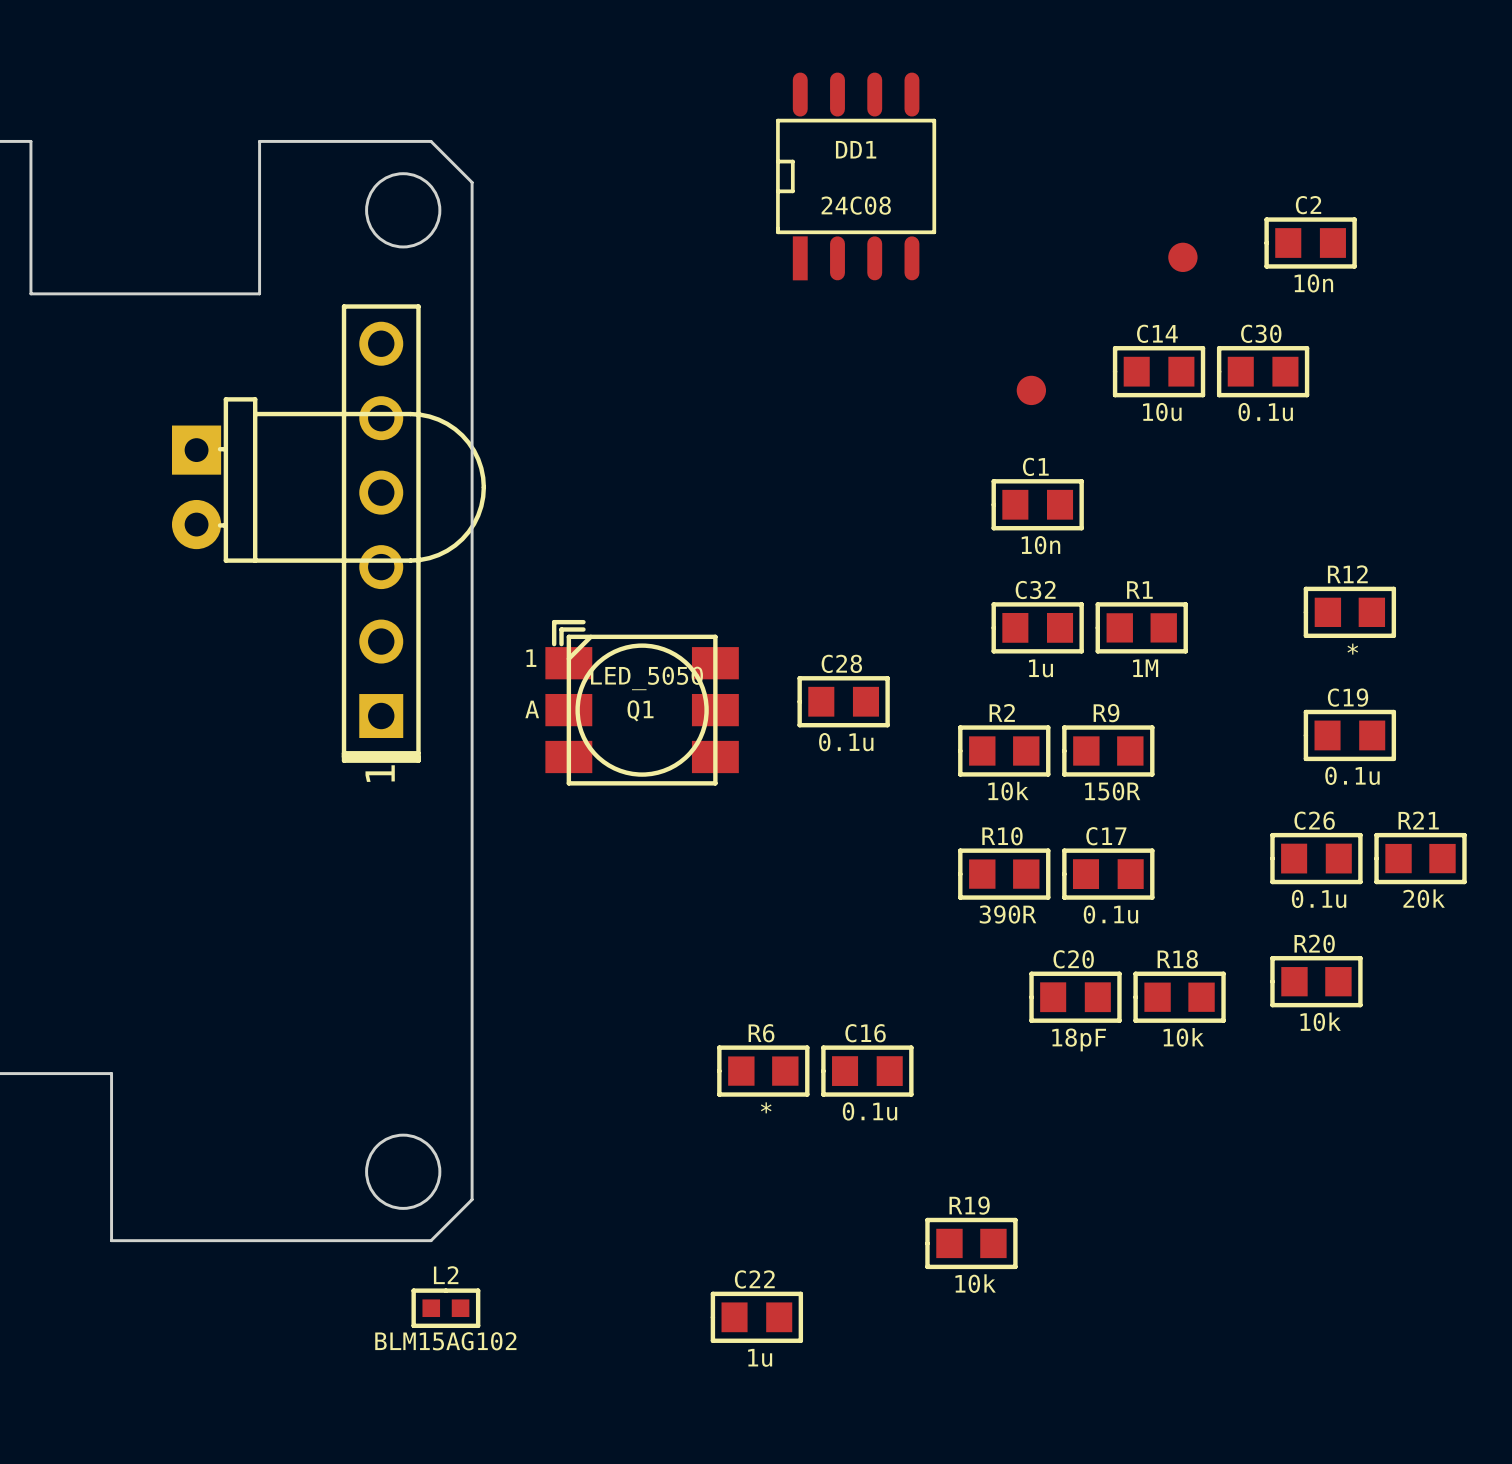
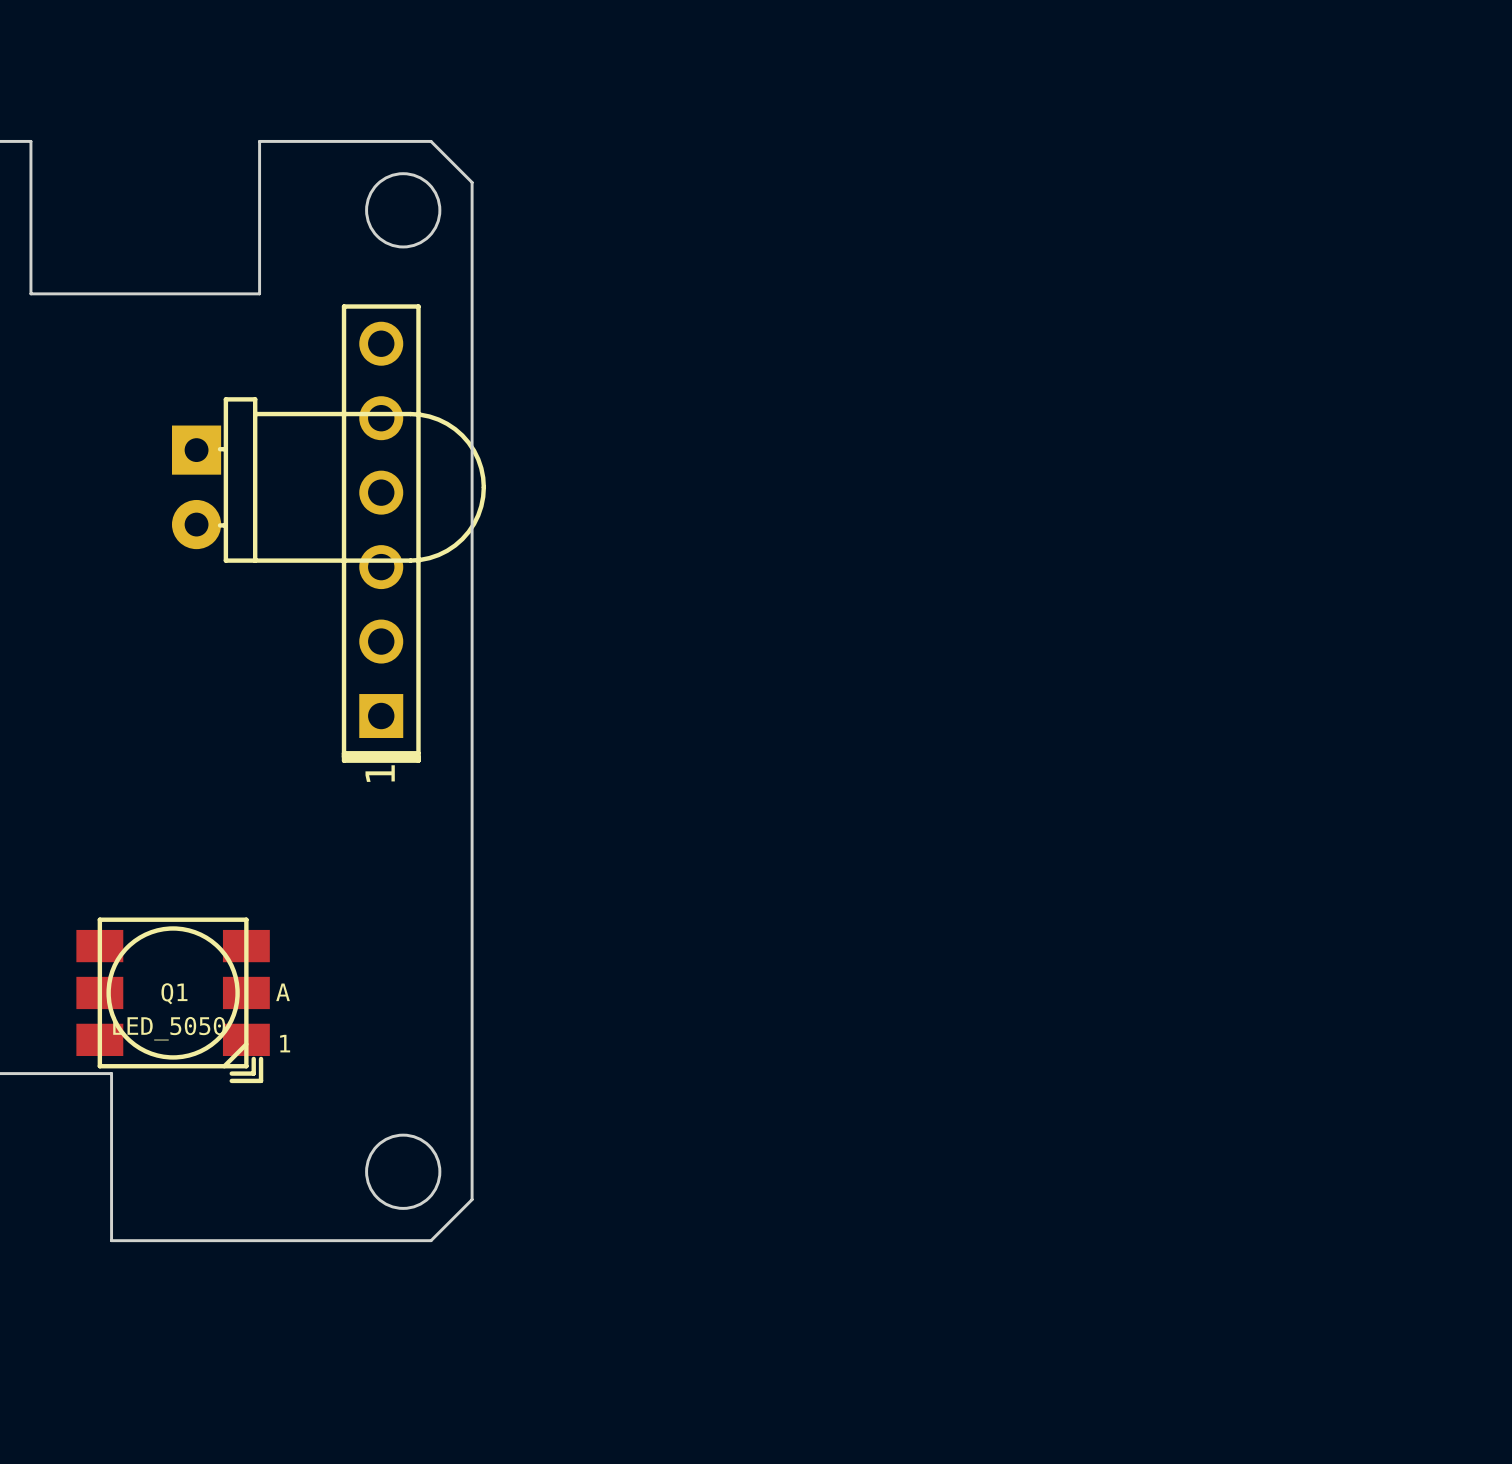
DD1: 24C08 (856, 176) -> none
C2: 10n (1310, 243) -> none
part: (1182, 257) -> none
C14: 10u (1159, 371) -> none
C30: 0.1u (1263, 371) -> none
part: (1031, 390) -> none
C1: 10n (1037, 504) -> none
R12: * (1349, 612) -> none
C32: 1u (1037, 627) -> none
R1: 1M (1141, 627) -> none
C28: 0.1u (843, 701) -> none
Q1 rotation: 0° (642, 702) -> 180° (173, 1000)
Q1 position: (642, 702) -> (173, 1000)
C19: 0.1u (1349, 735) -> none
R2: 10k (1004, 750) -> none
R9: 150R (1108, 750) -> none
C26: 0.1u (1316, 858) -> none
R21: 20k (1420, 858) -> none
R10: 390R (1004, 874) -> none
C17: 0.1u (1108, 874) -> none
R20: 10k (1316, 981) -> none
C20: 18pF (1075, 997) -> none
R18: 10k (1179, 997) -> none
R6: * (763, 1071) -> none
C16: 0.1u (867, 1071) -> none
R19: 10k (971, 1243) -> none
L2: BLM15AG102 (445, 1308) -> none
C22: 1u (756, 1317) -> none

